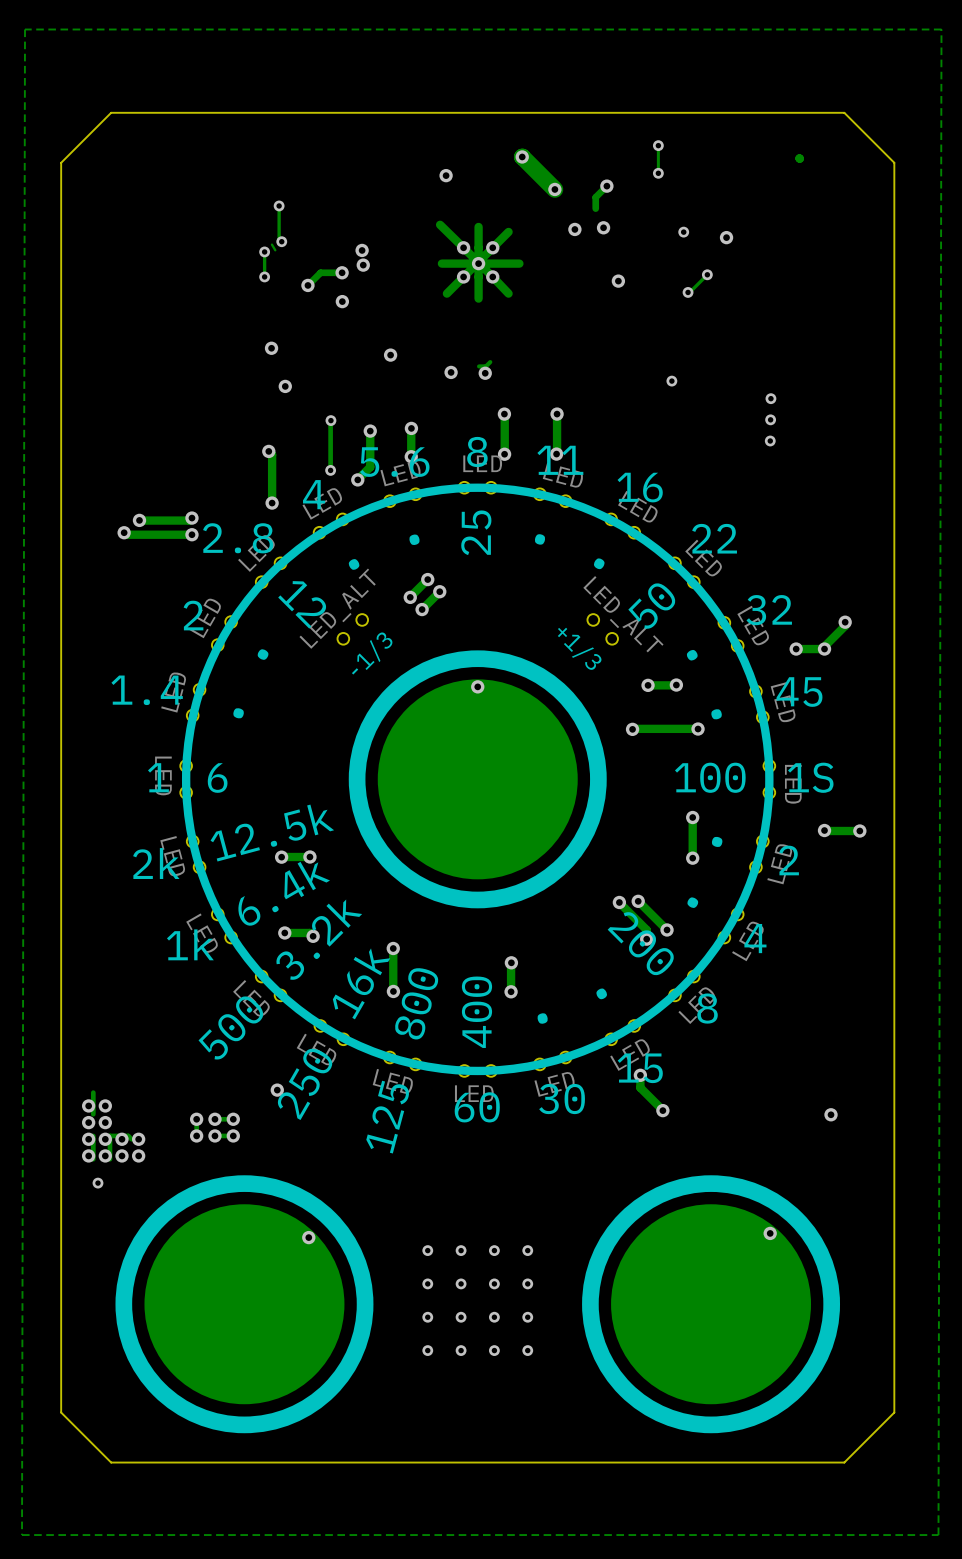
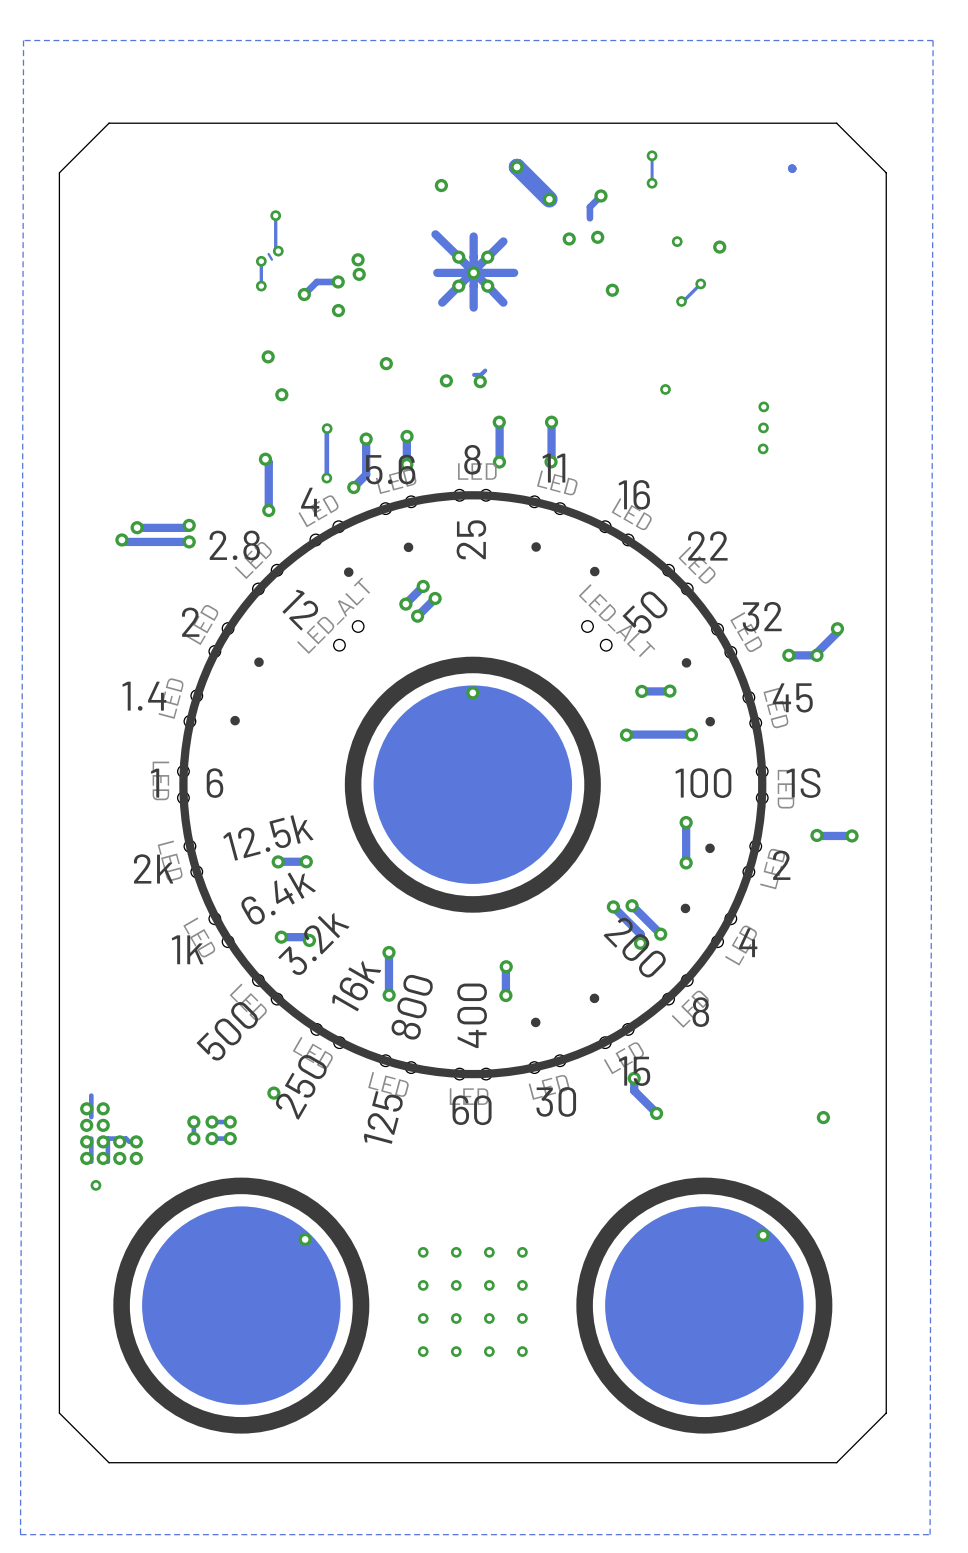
text: +1/3 (579, 648) -> none
text: -1/3 (372, 653) -> none

